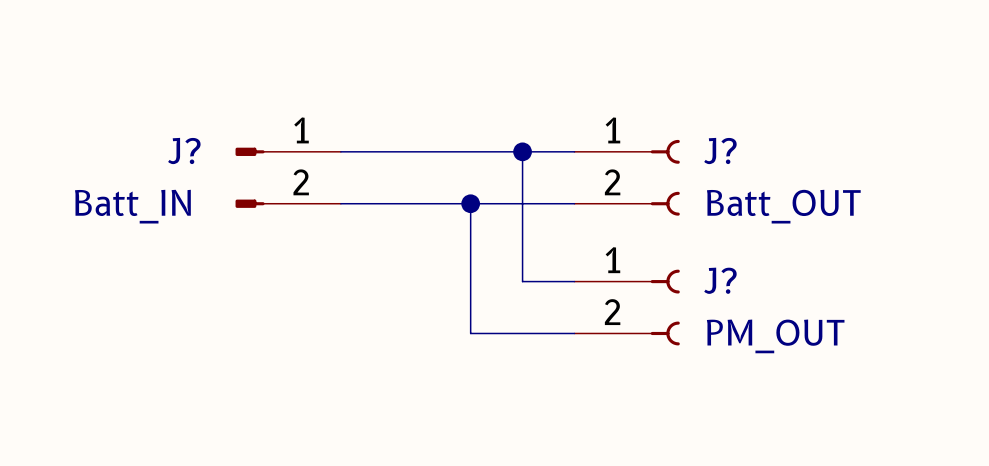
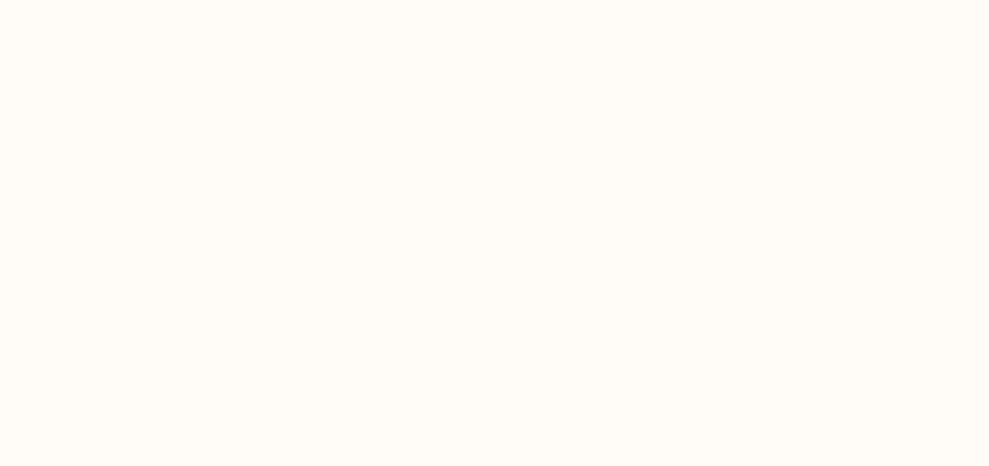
wire: (340, 151) (574, 151) -> none
wire: (522, 151) (522, 281) (574, 281) -> none
junction: (522, 151) -> none
J?: Batt_IN (288, 177) -> none
J?: Batt_OUT (627, 177) -> none
wire: (340, 203) (574, 203) -> none
wire: (470, 203) (470, 333) (574, 333) -> none
junction: (470, 203) -> none
J?: PM_OUT (627, 307) -> none

